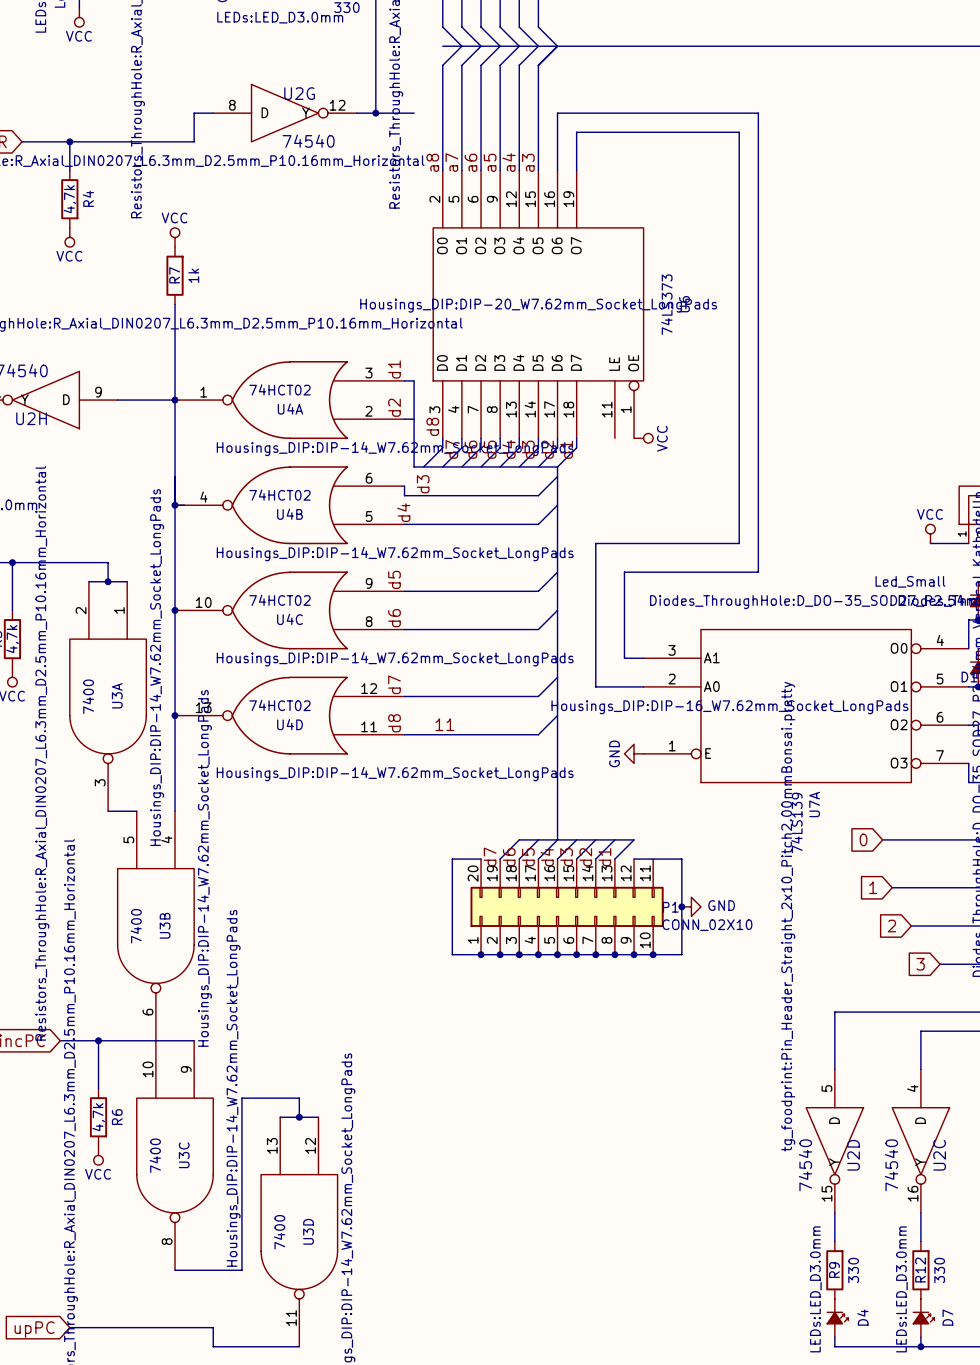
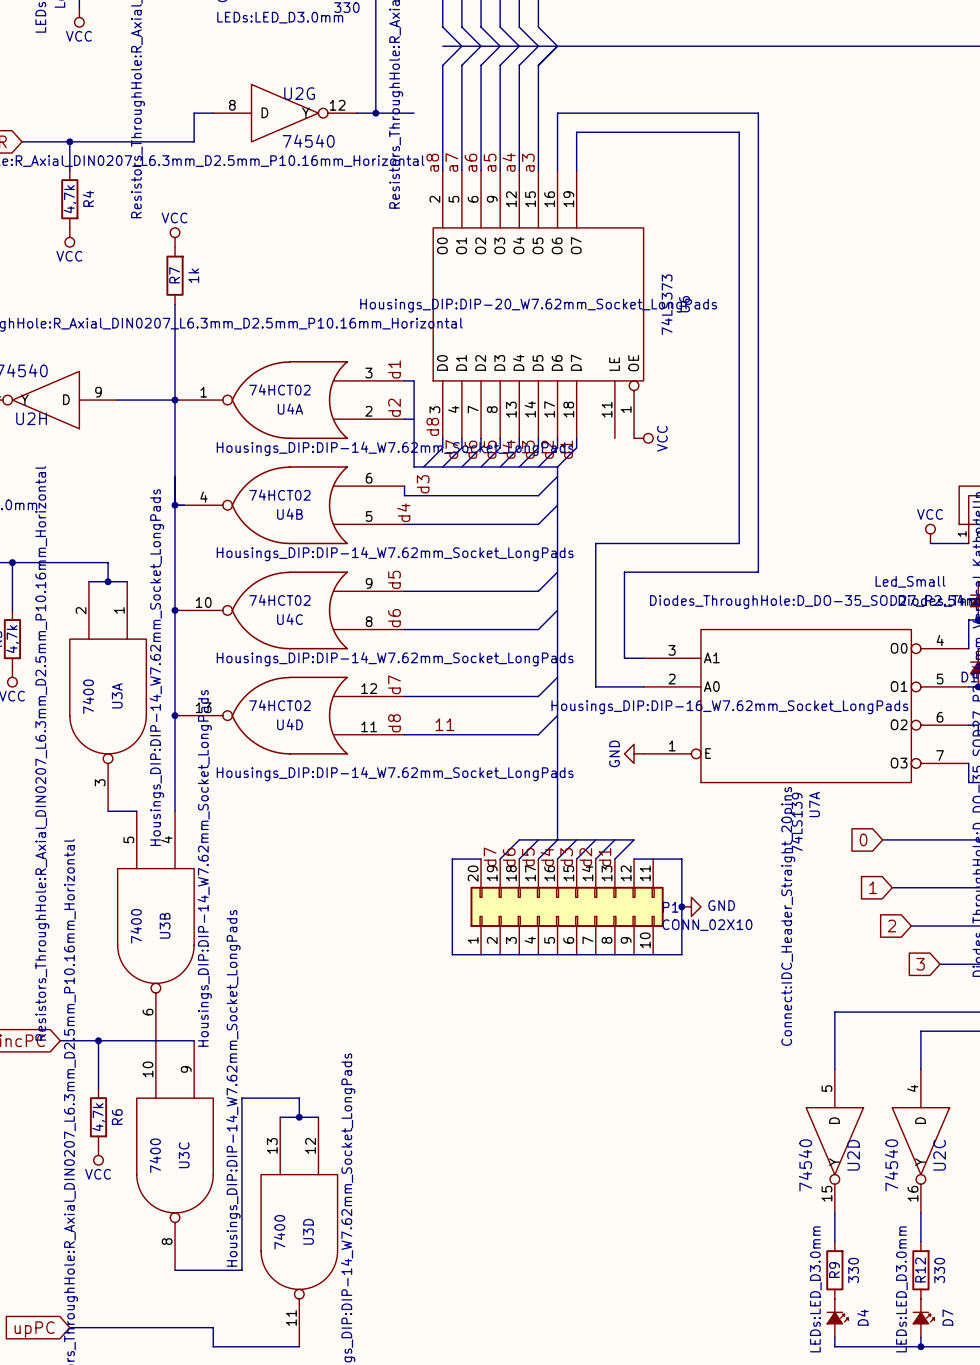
P1 text: tg_foodprint:Pin_Header_Straight_2x10_Pitch2.00mmBonsai.pretty (788, 916) -> Connect:IDC_Header_Straight_20pins (788, 916)
junction: (481, 954) -> none
junction: (500, 954) -> none
junction: (519, 954) -> none
junction: (538, 954) -> none
junction: (557, 954) -> none
junction: (576, 954) -> none
junction: (595, 954) -> none
junction: (614, 954) -> none
junction: (634, 954) -> none
junction: (653, 954) -> none

